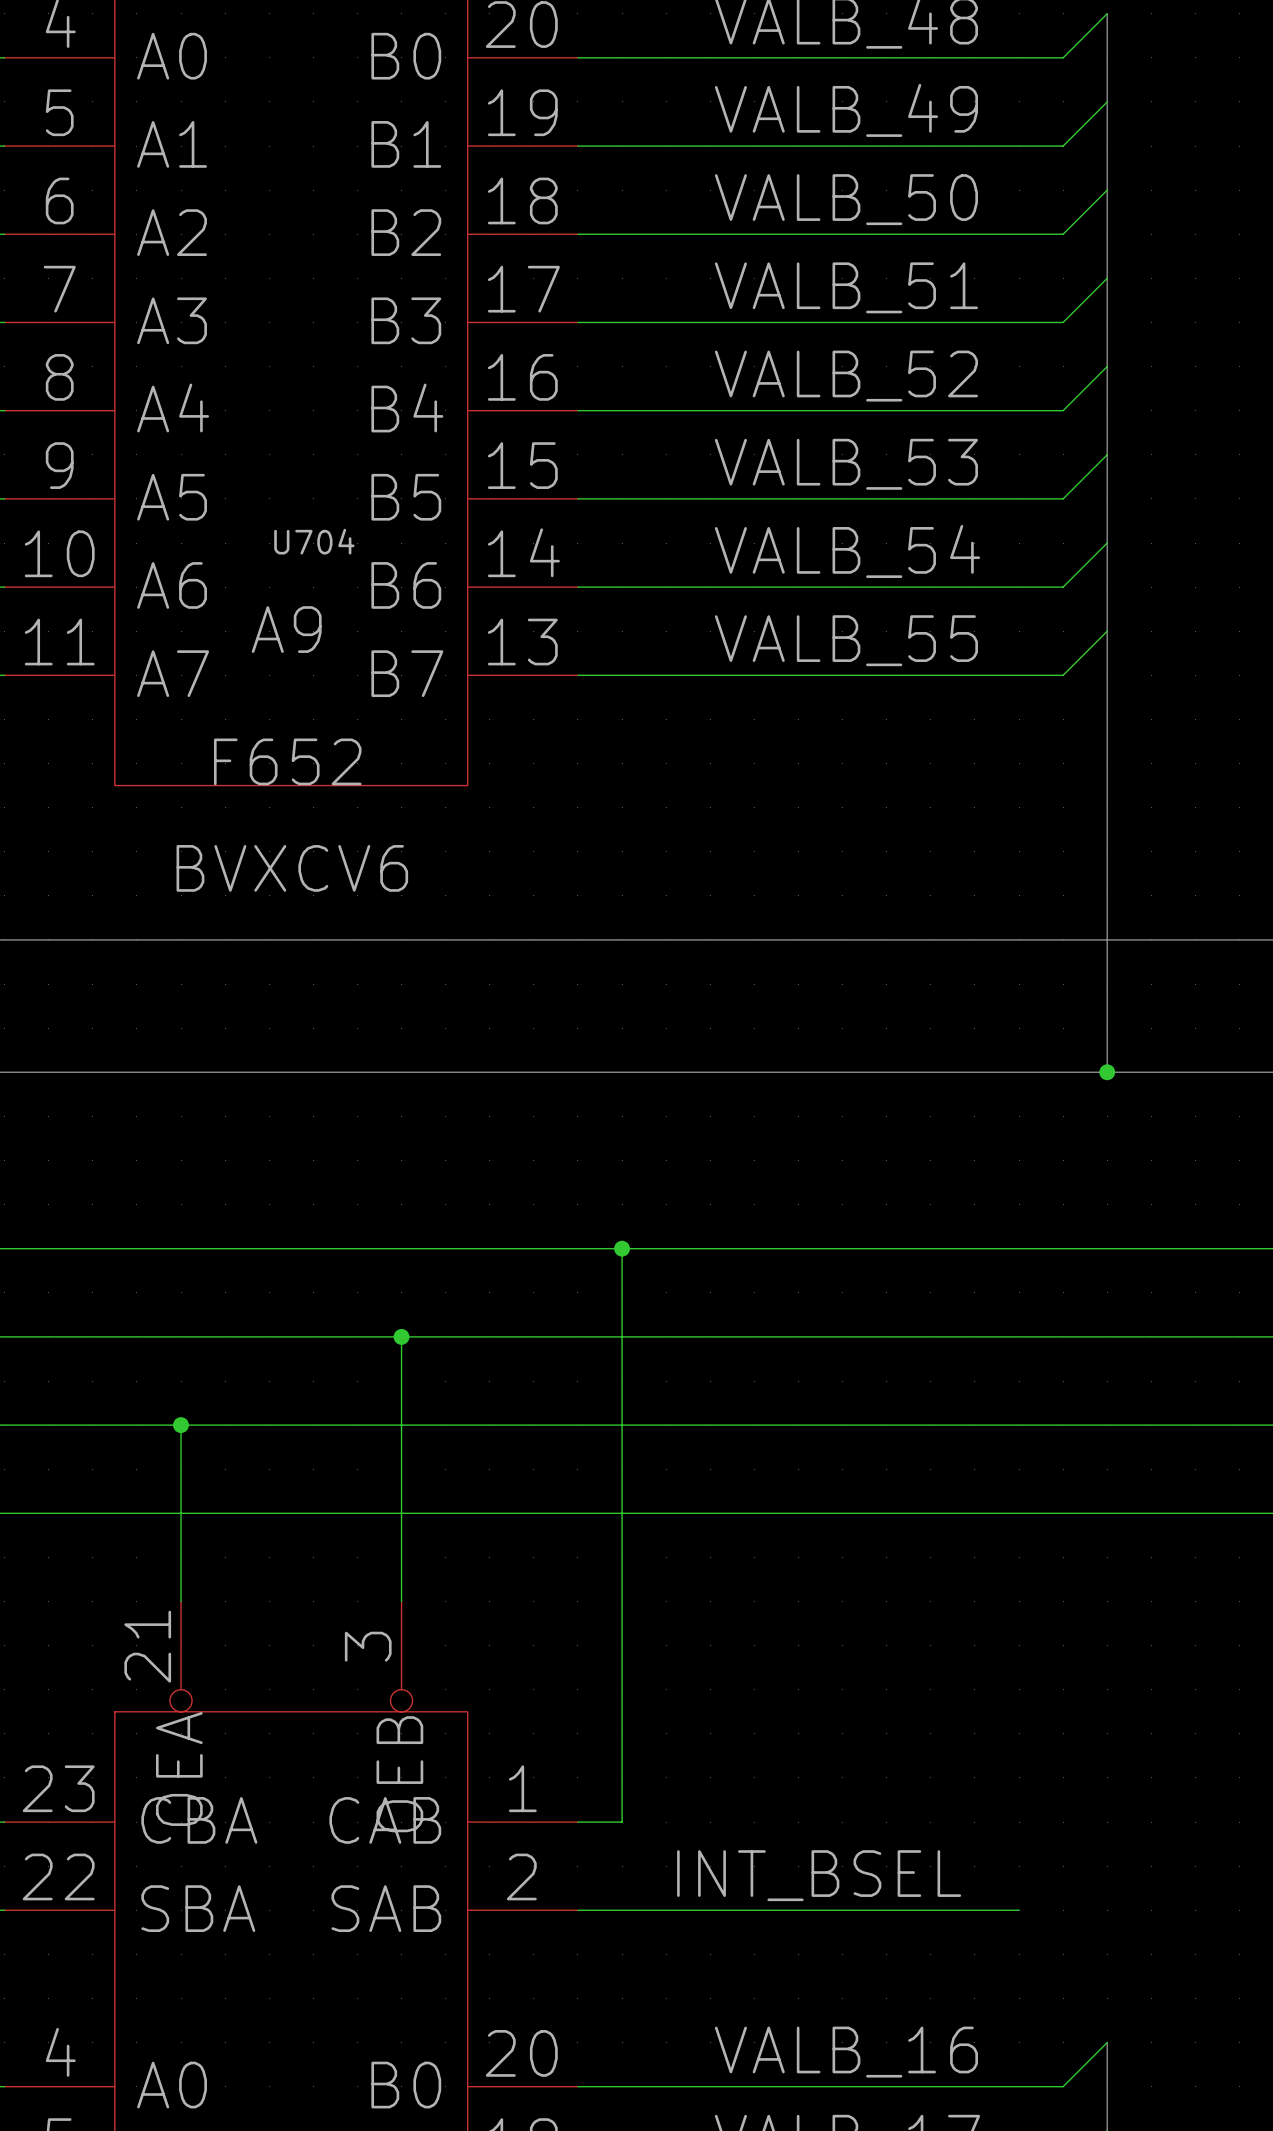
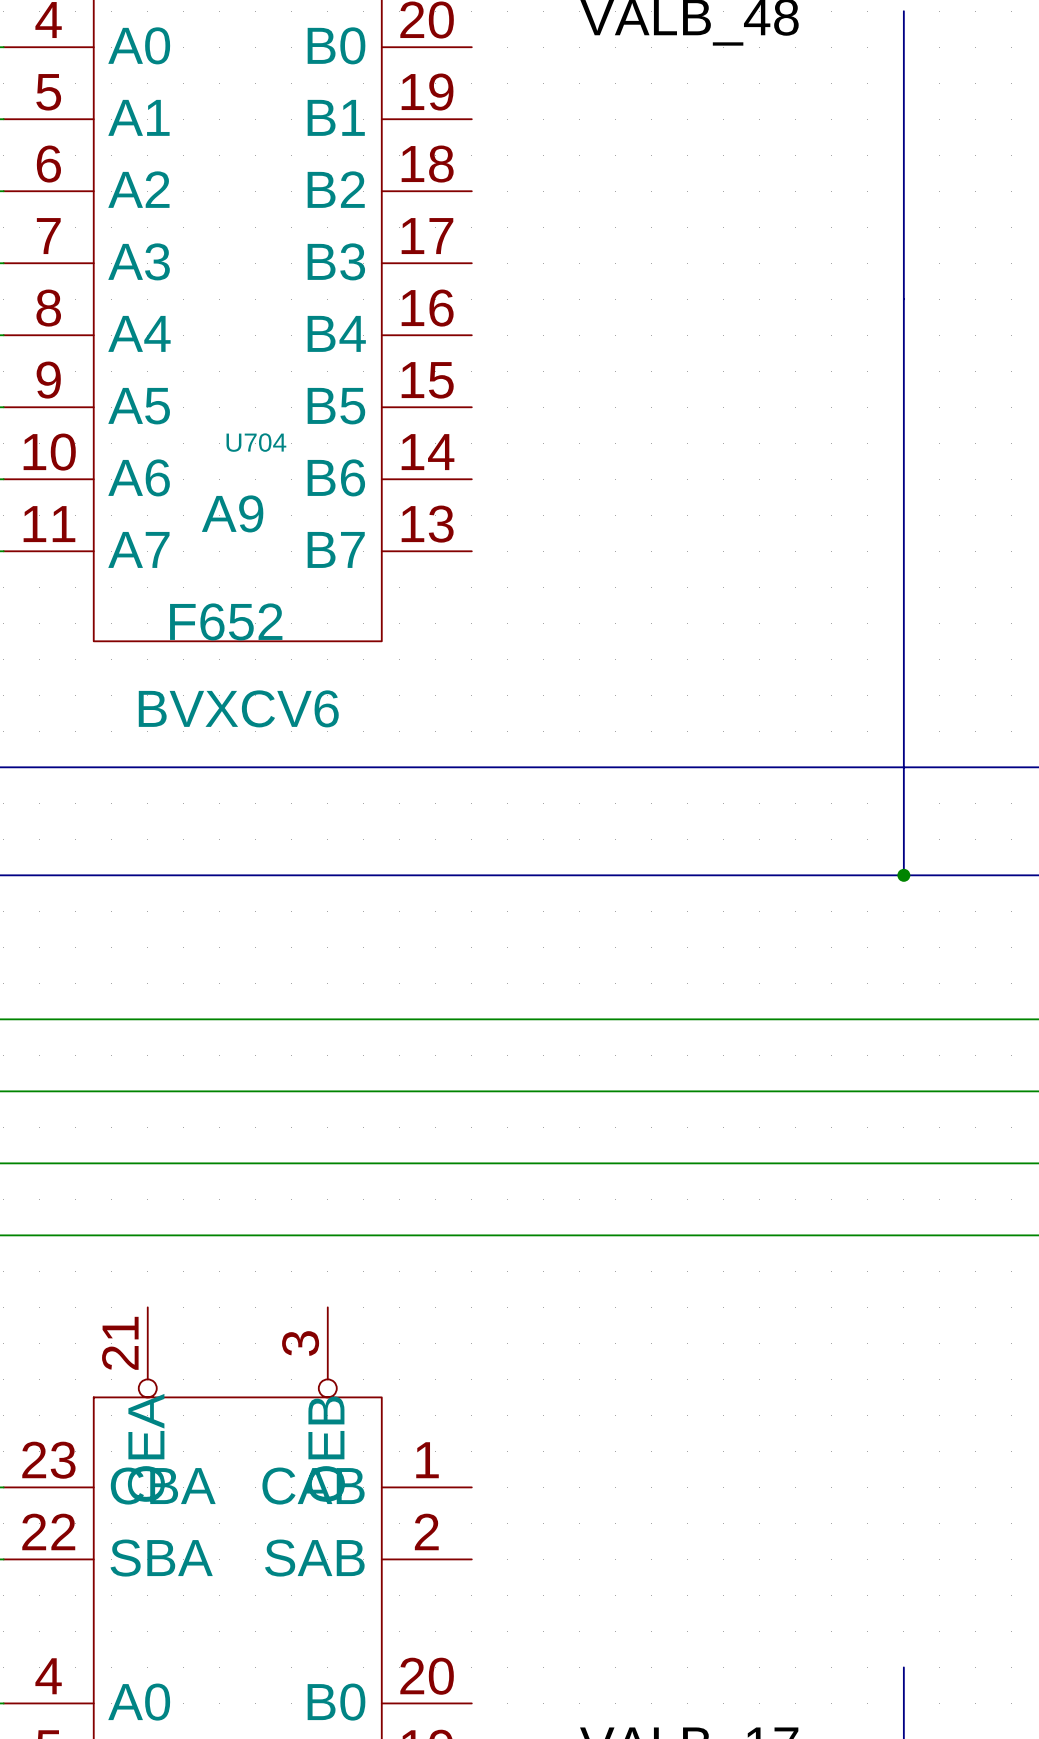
wire: (1107, 13) (1063, 57) (577, 57) -> none
wire: (1107, 101) (1063, 146) (577, 146) -> none
label: VALB_49 (846, 110) -> none
wire: (1107, 190) (1063, 234) (577, 234) -> none
label: VALB_50 (846, 199) -> none
wire: (1107, 278) (1063, 322) (577, 322) -> none
label: VALB_51 (846, 287) -> none
wire: (1107, 366) (1063, 410) (577, 410) -> none
label: VALB_52 (846, 376) -> none
wire: (1107, 454) (1063, 498) (577, 498) -> none
label: VALB_53 (846, 464) -> none
wire: (1107, 543) (1063, 587) (577, 587) -> none
label: VALB_54 (847, 551) -> none
wire: (1107, 631) (1063, 675) (577, 675) -> none
label: VALB_55 (846, 640) -> none
wire: (622, 1248) (622, 1822) (577, 1822) -> none
junction: (622, 1248) -> none
wire: (401, 1336) (401, 1601) -> none
junction: (401, 1336) -> none
wire: (181, 1425) (181, 1601) -> none
junction: (181, 1425) -> none
label: INT_BSEL (819, 1875) -> none
wire: (577, 1910) (1019, 1910) -> none
wire: (1107, 2042) (1063, 2086) (577, 2086) -> none
label: VALB_16 (846, 2052) -> none

